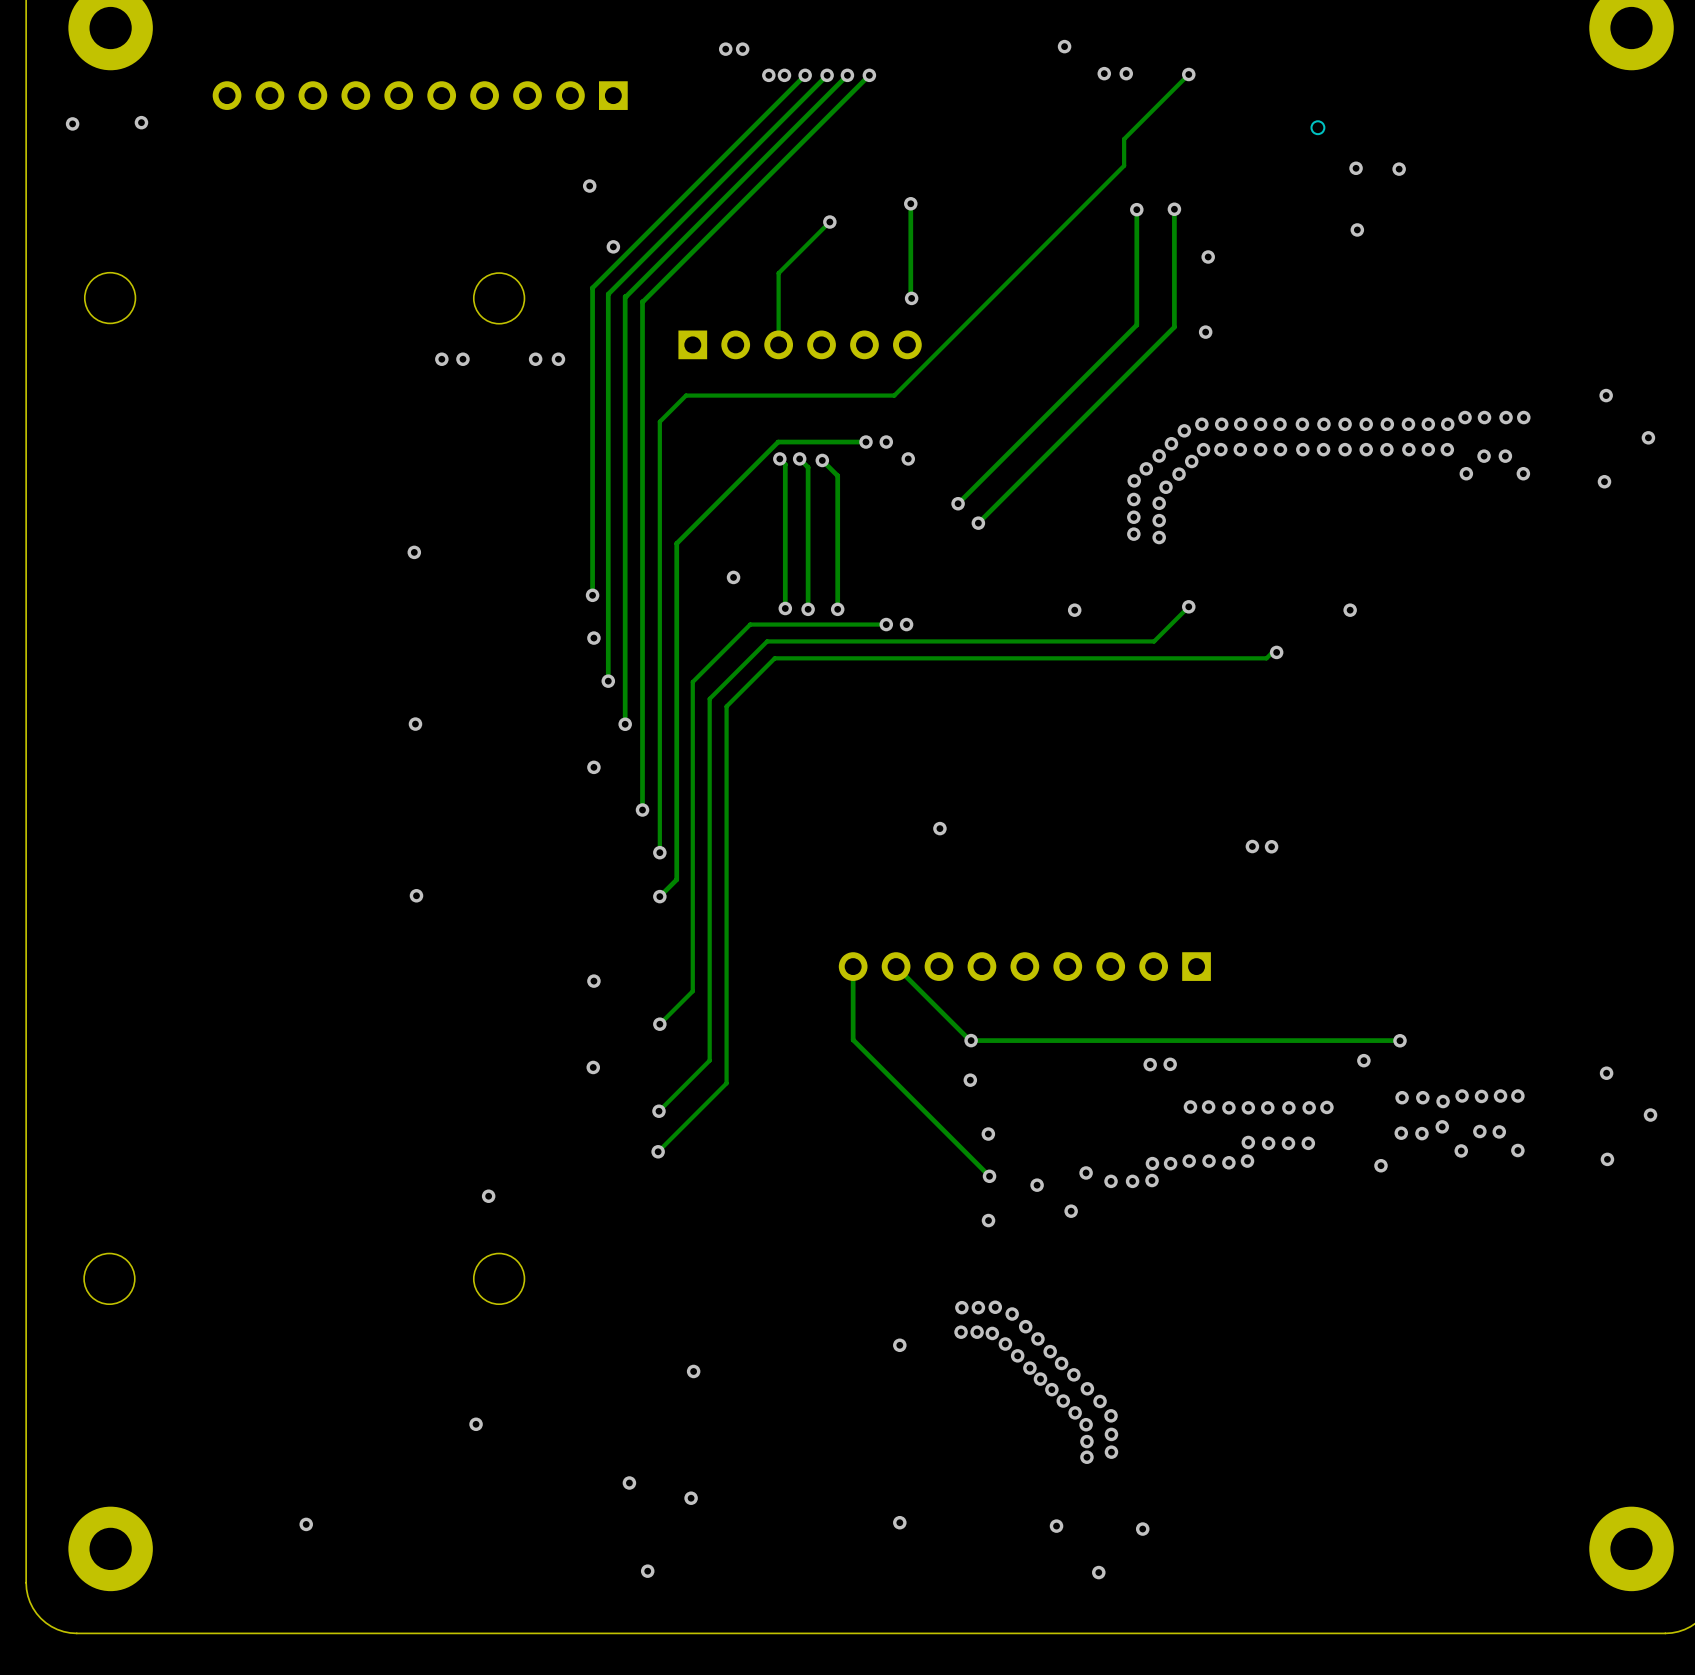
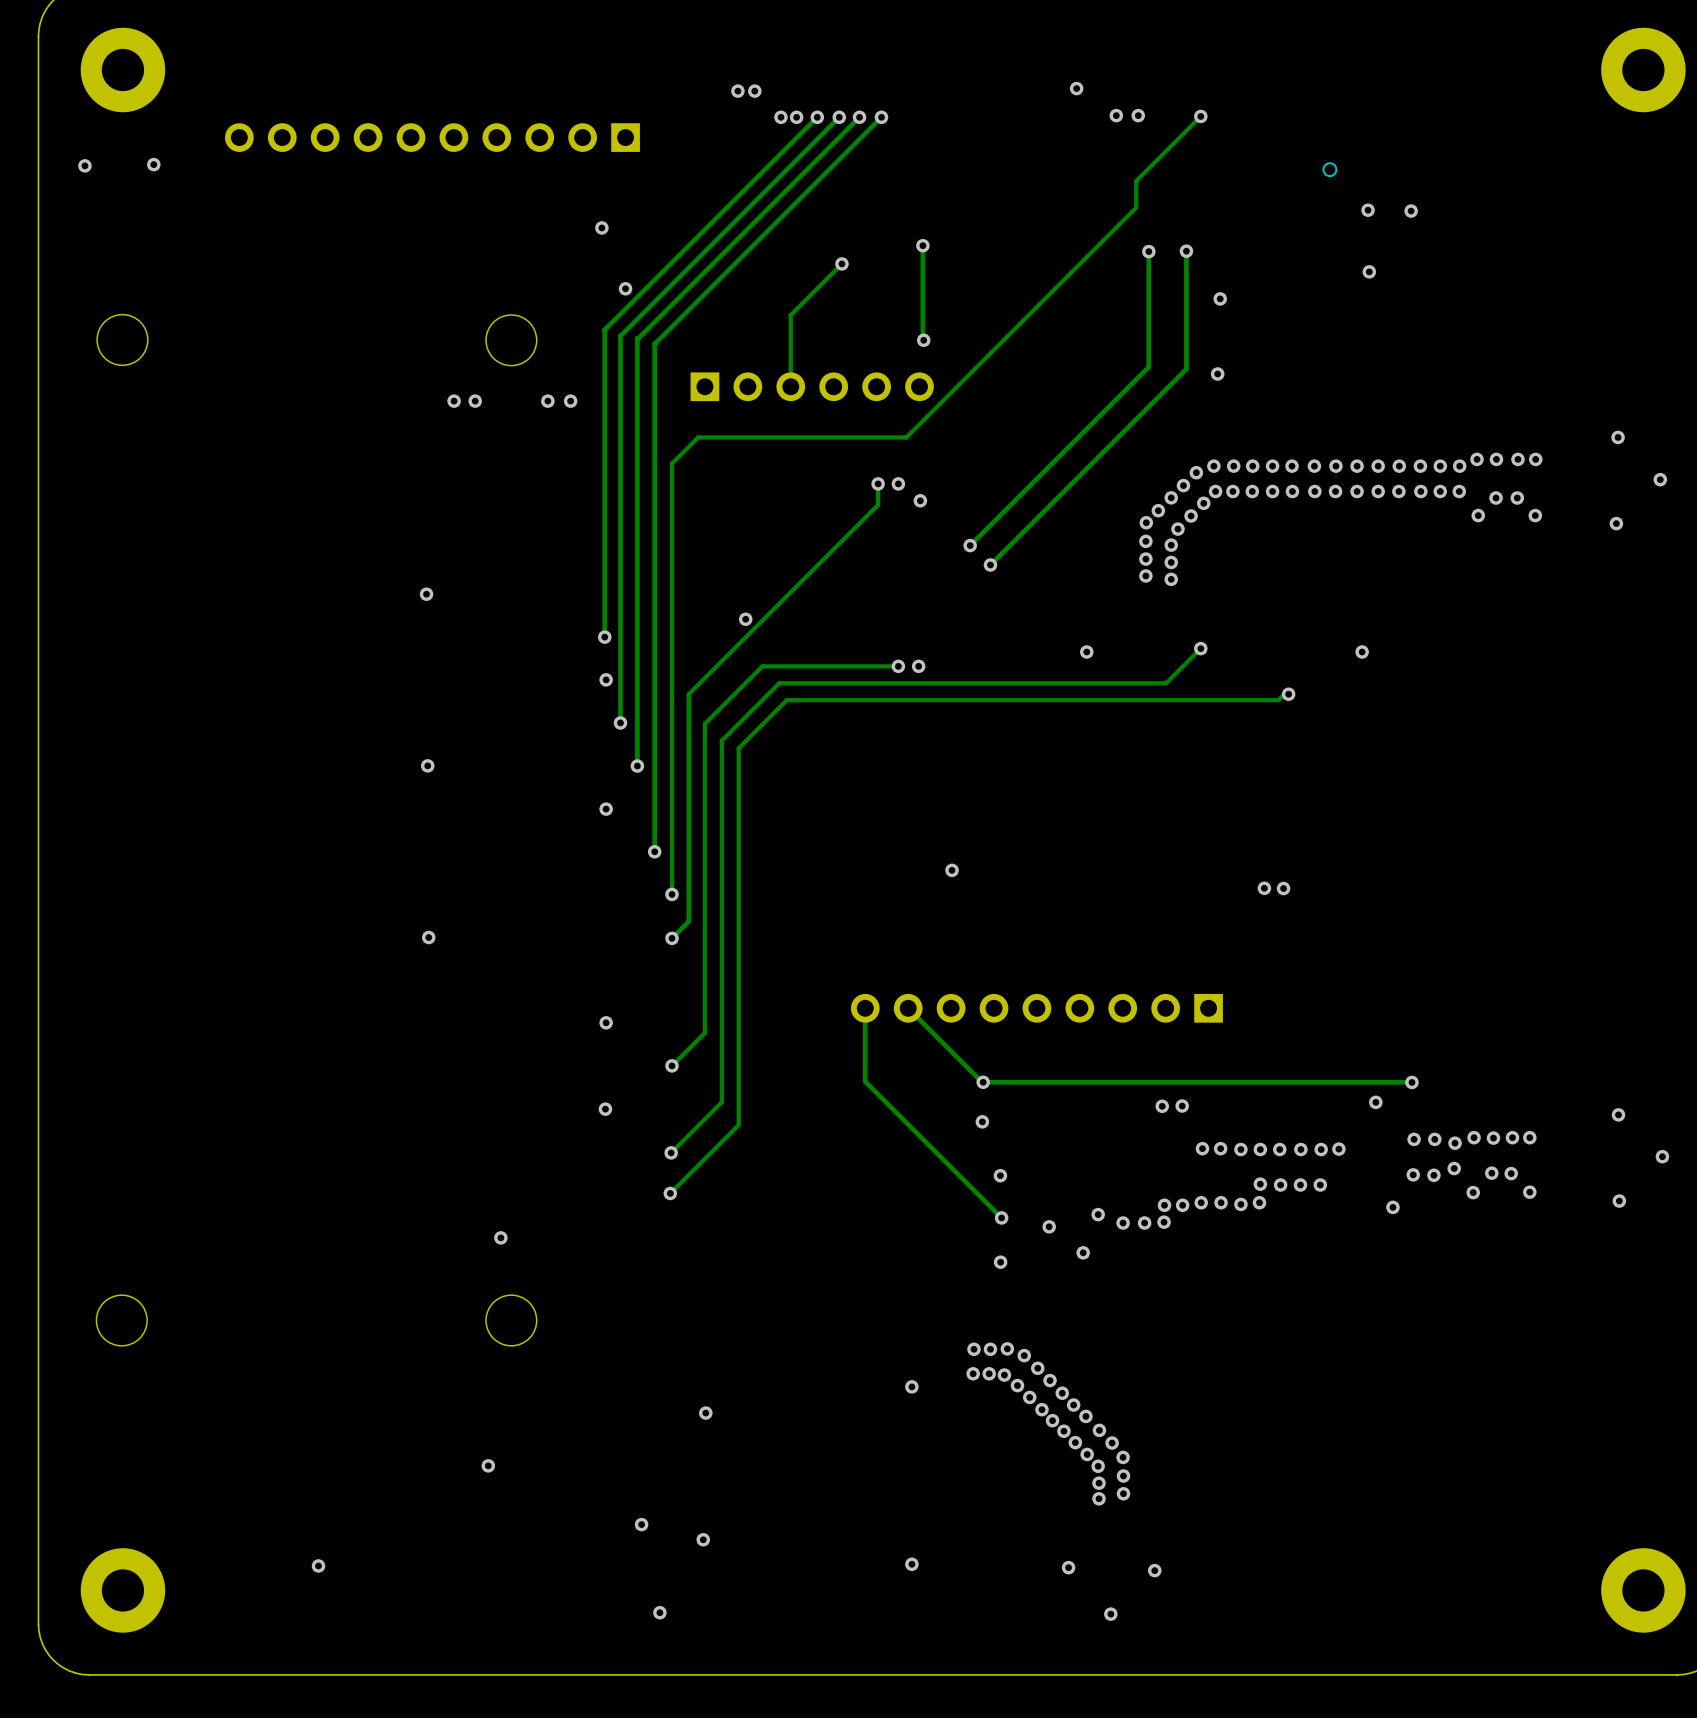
track: (866, 442) (778, 442) (676, 543) (676, 652) -> (878, 483) (878, 504) (688, 694)
track: (779, 458) (785, 464) (785, 608) -> none
via: (779, 458) -> none
track: (799, 458) (808, 467) (808, 609) -> none
via: (799, 458) -> none
track: (822, 460) (837, 475) (837, 609) -> none
via: (822, 460) -> none
via: (785, 608) -> none
via: (808, 609) -> none
via: (837, 609) -> none

